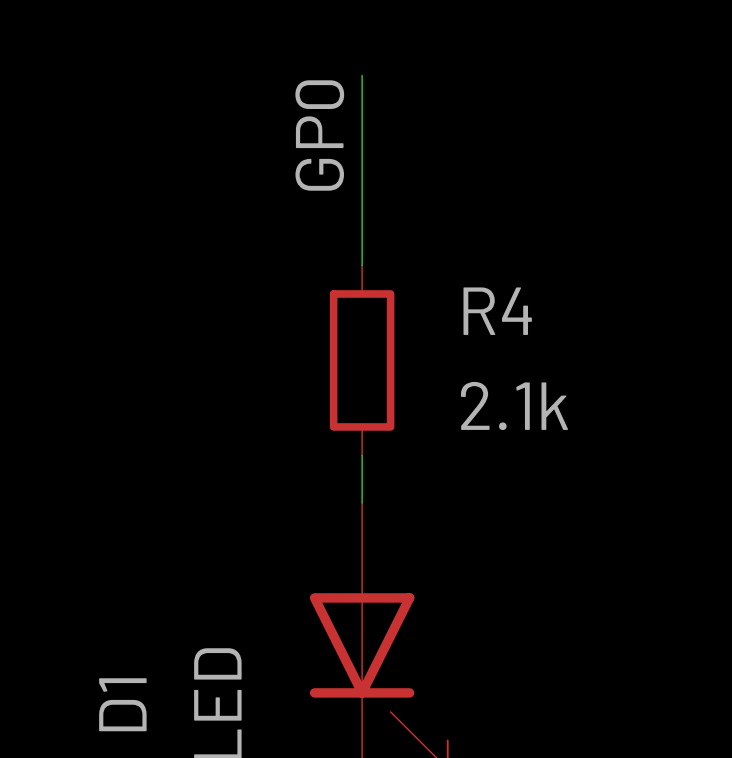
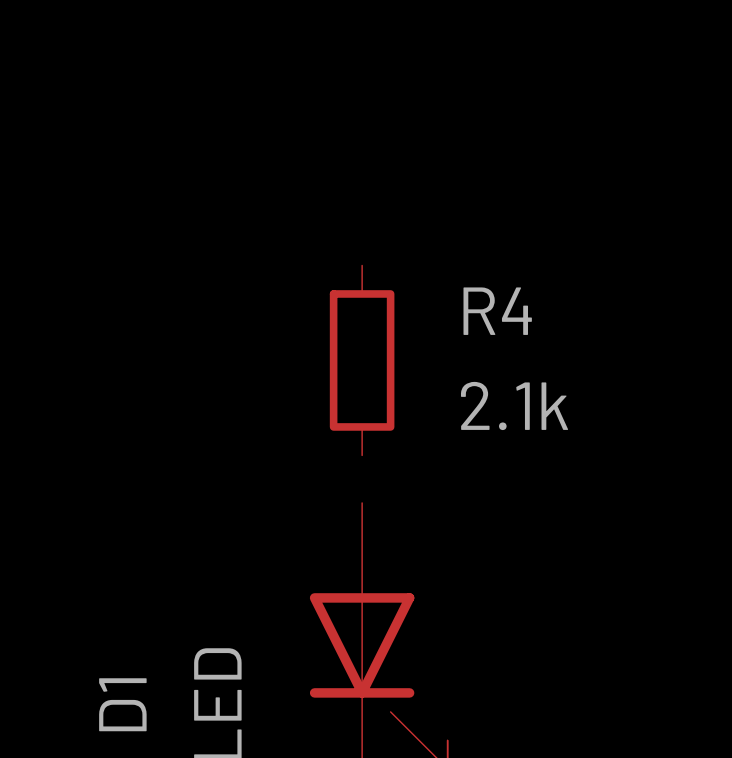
wire: (362, 75) (362, 265) -> none
label: GP0 (319, 135) -> none
wire: (362, 455) (362, 502) -> none

